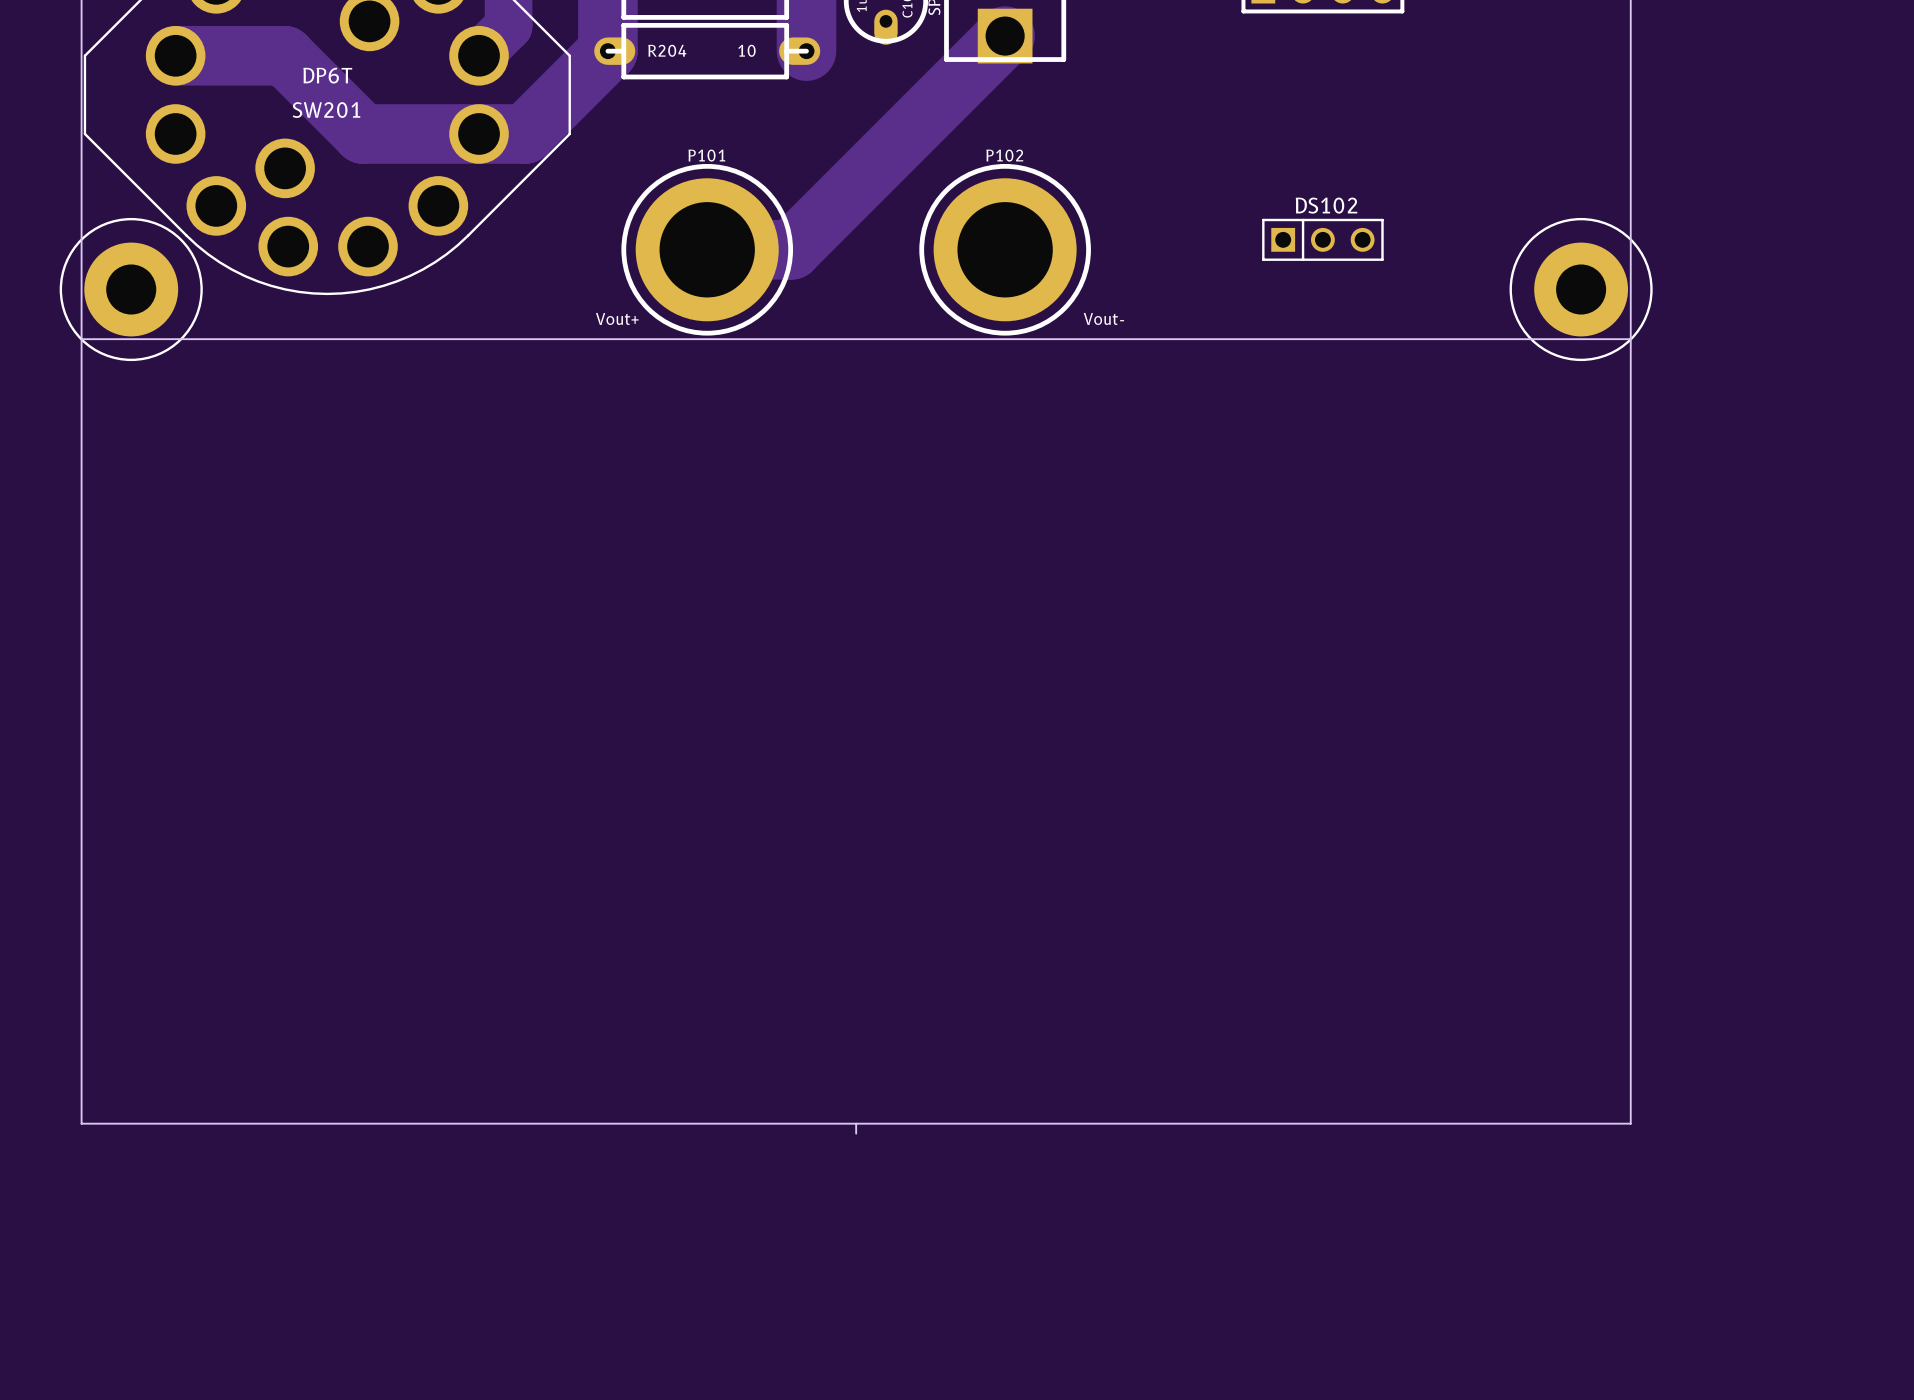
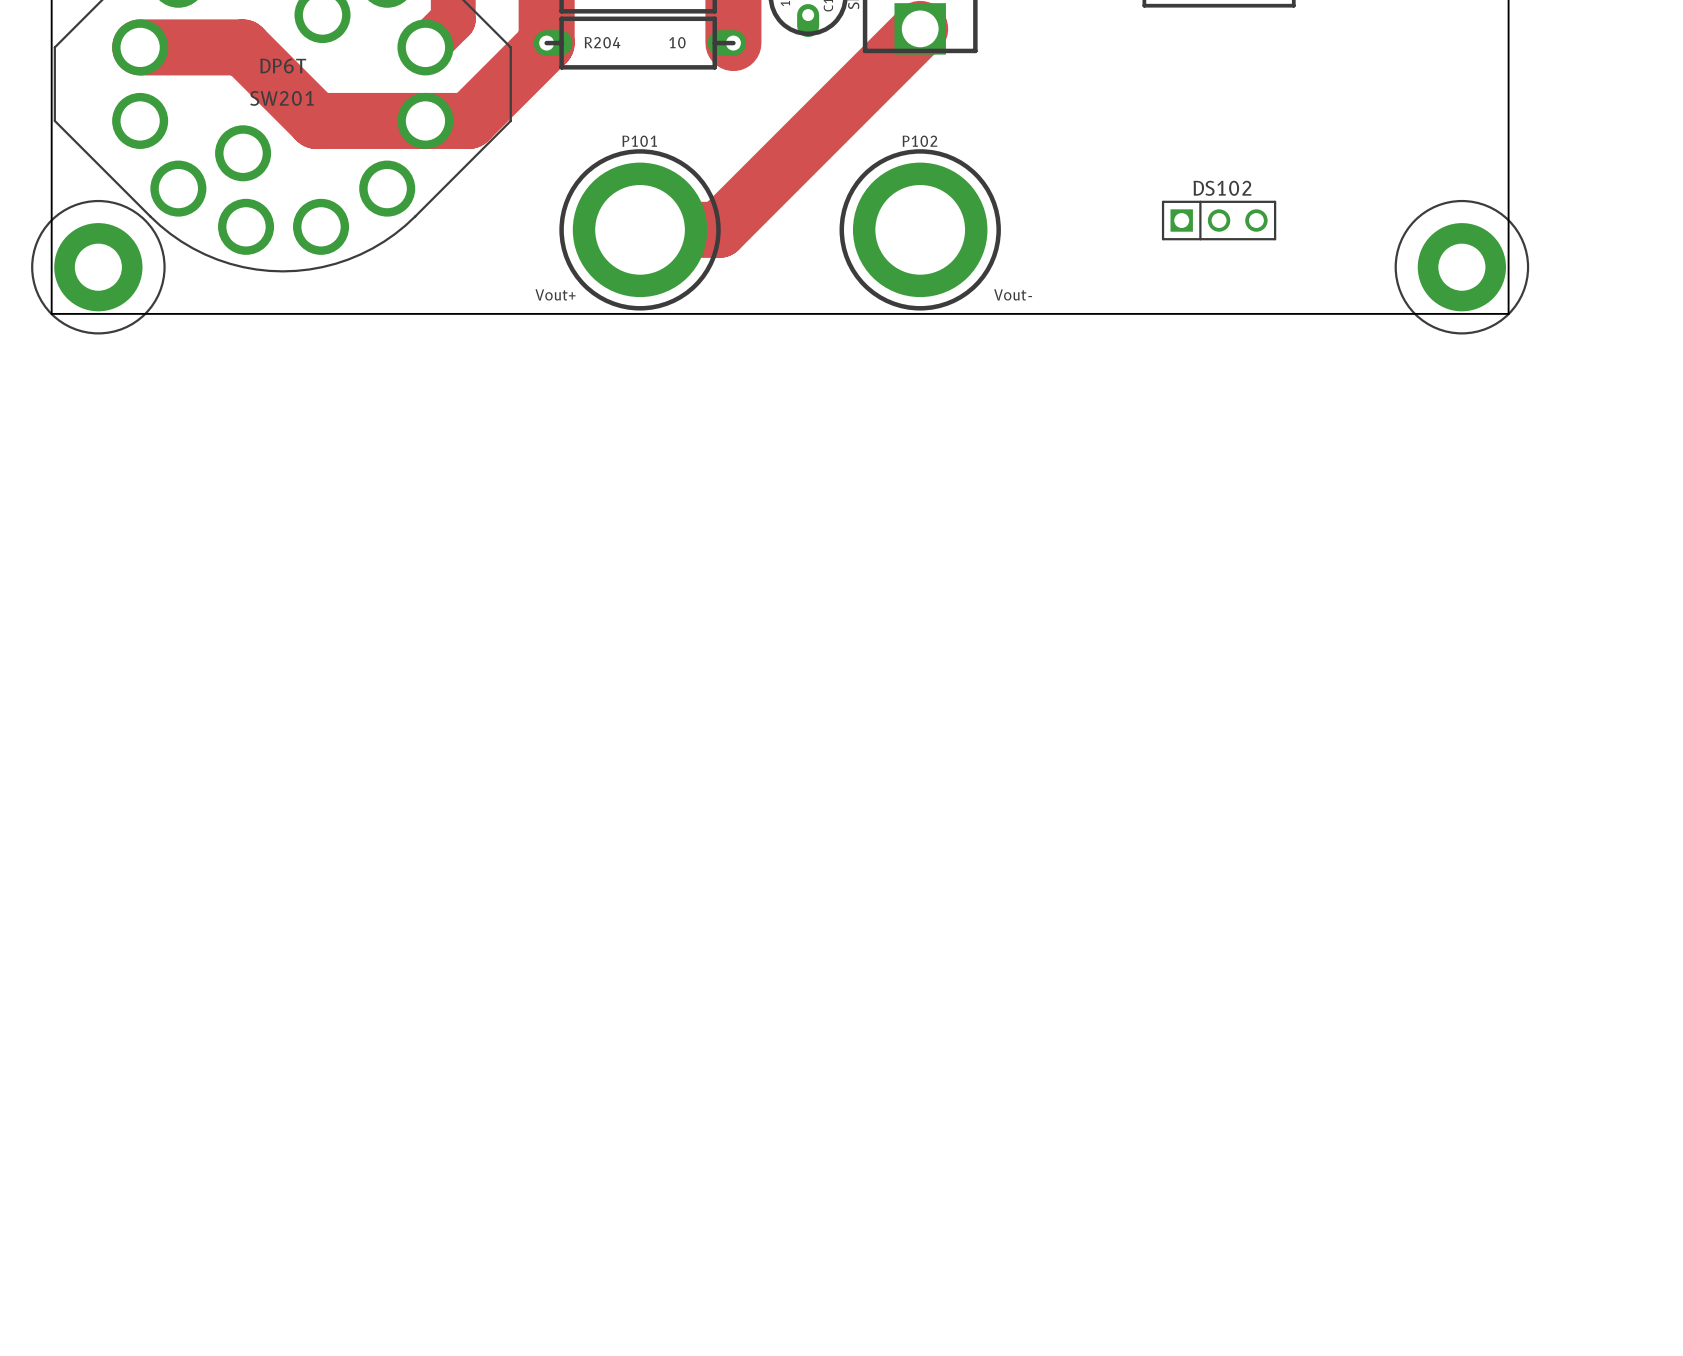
board edge: (81, 339) (81, 1123) (1630, 1123) (1630, 339) -> none
board edge: (856, 1123) (856, 1133) -> none

